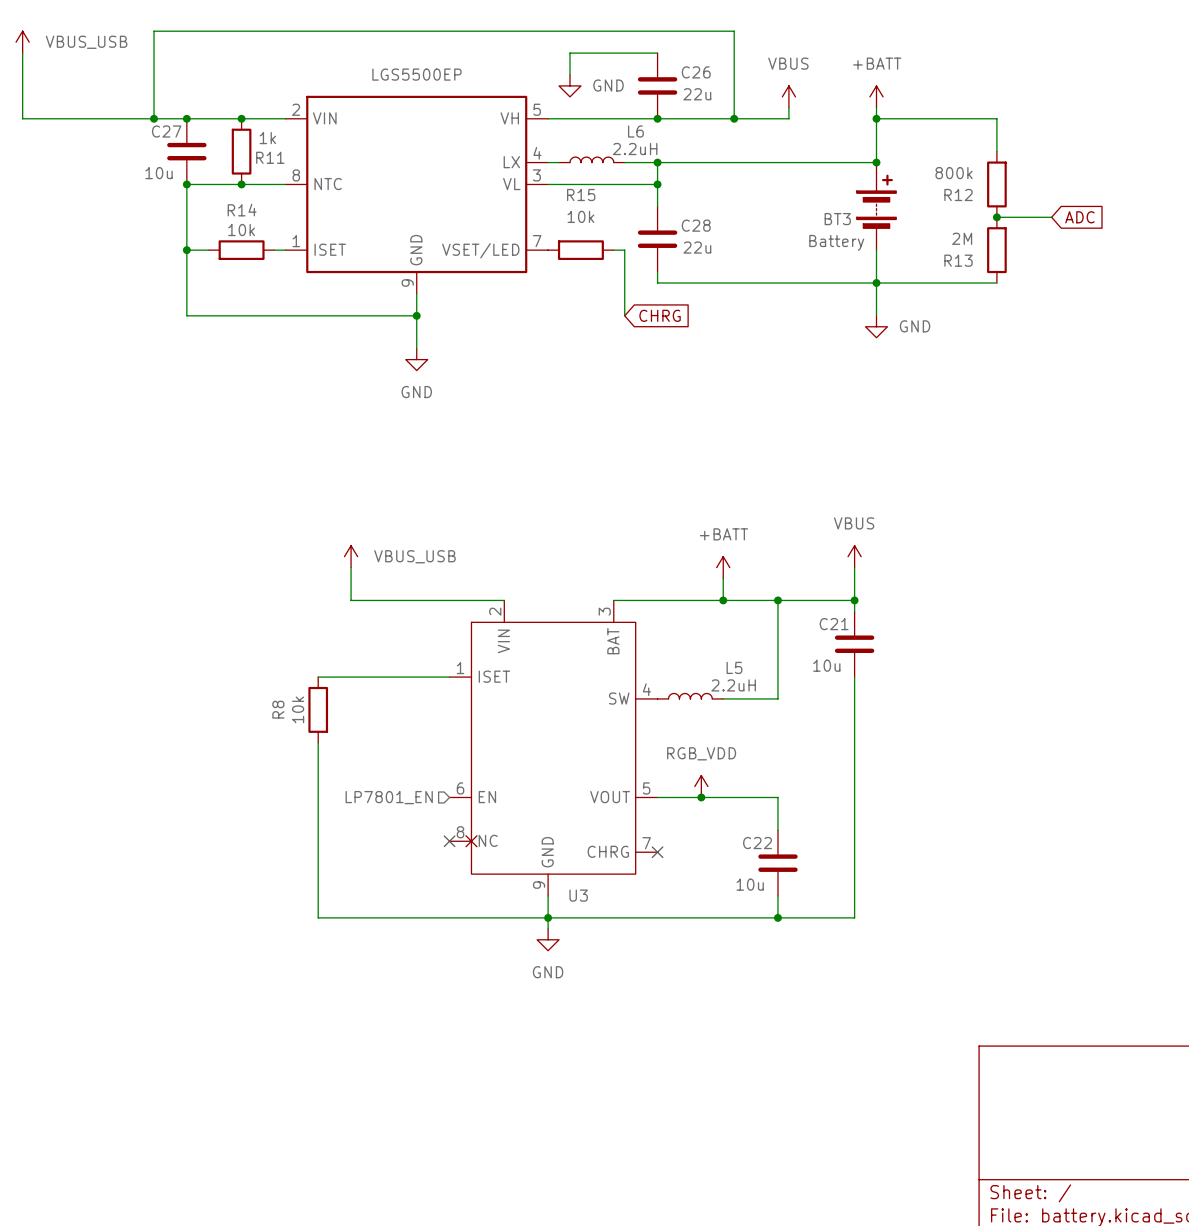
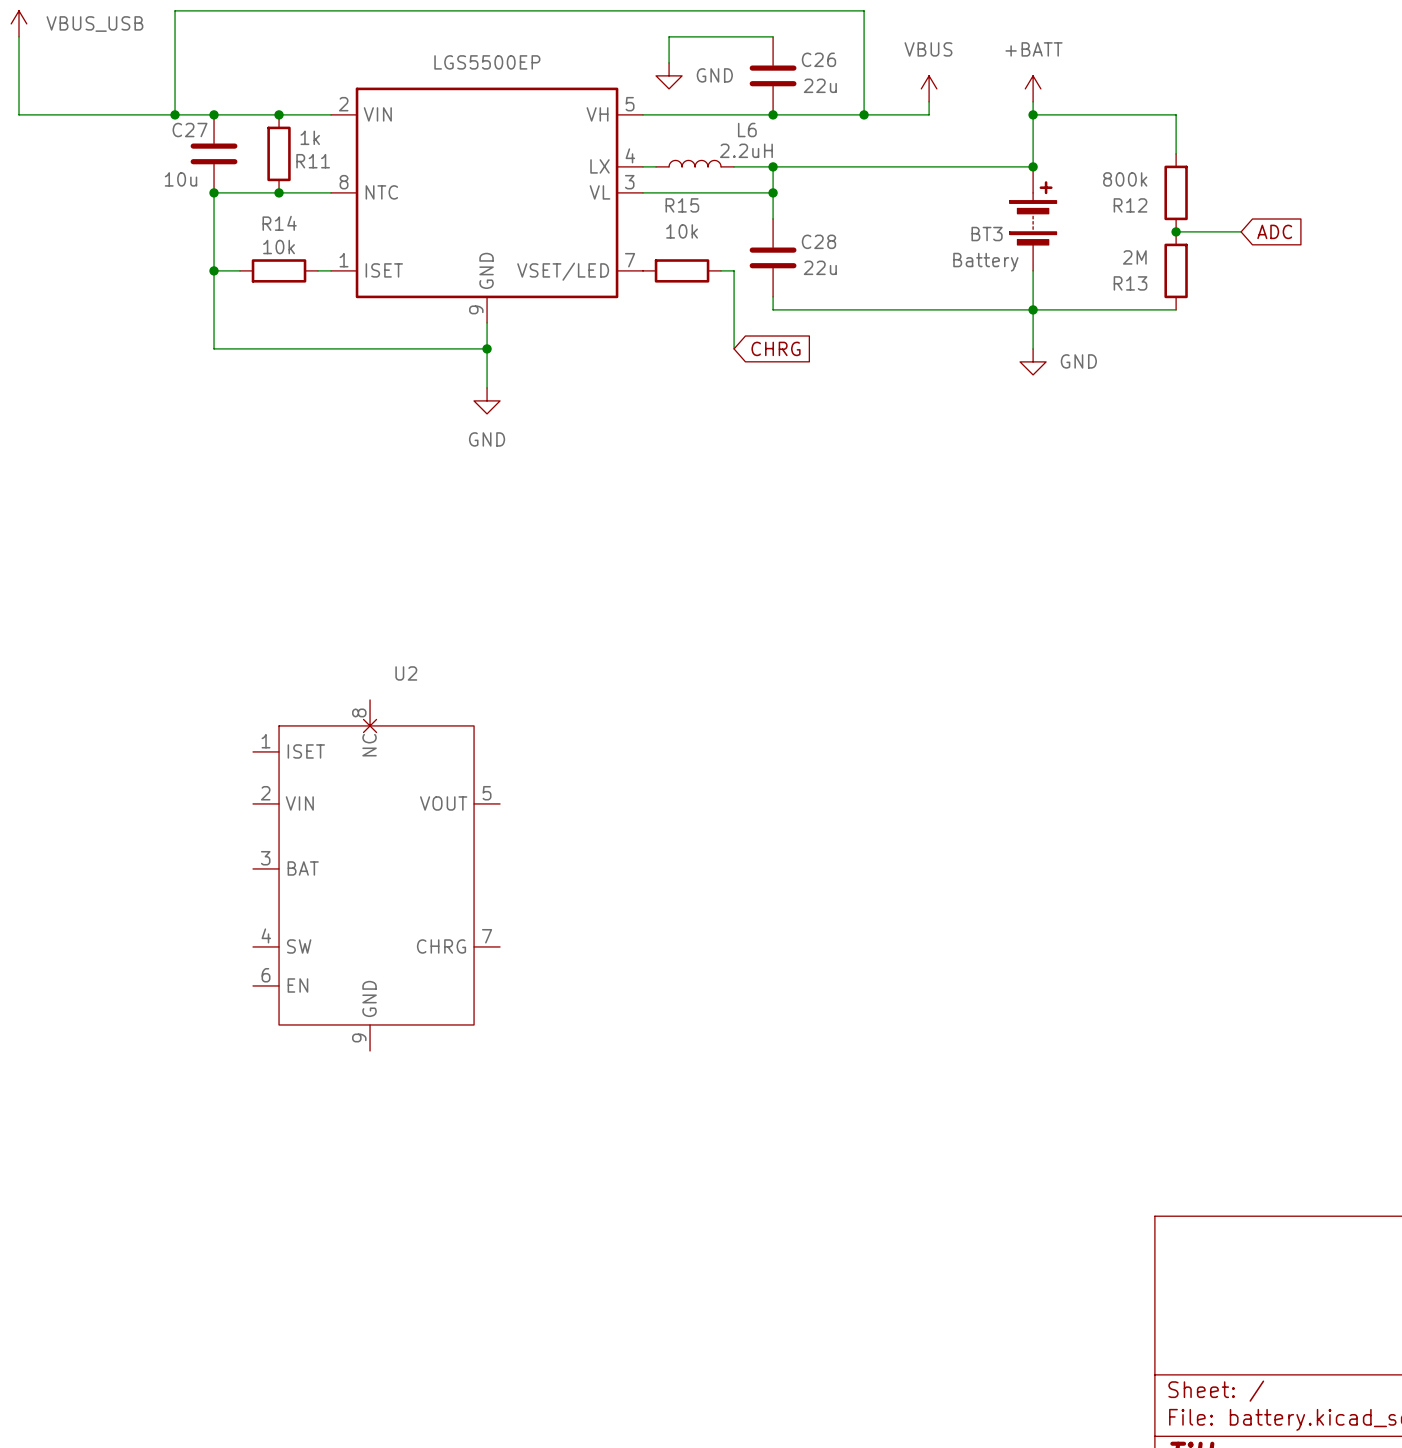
power symbol: VBUS_USB (351, 556) -> none
power symbol: VBUS (854, 556) -> none
wire: (351, 567) (351, 600) (504, 600) -> none
power symbol: +BATT (723, 567) -> none
wire: (854, 567) (854, 611) -> none
wire: (723, 578) (723, 600) -> none
wire: (613, 600) (854, 600) -> none
junction: (723, 600) -> none
wire: (777, 600) (777, 698) (723, 698) -> none
junction: (777, 600) -> none
junction: (854, 600) -> none
C21: 10u (854, 644) -> none
wire: (318, 677) (449, 677) -> none
wire: (854, 677) (854, 917) (318, 917) (318, 742) -> none
L5: 2.2uH (690, 696) -> none
R8: 10k (318, 709) -> none
U3: (553, 748) -> none
U2: none -> (376, 875)
power symbol: RGB_VDD (701, 786) -> none
hierarchical label: LP7801_EN (389, 797) -> none
wire: (657, 797) (777, 797) (777, 830) -> none
junction: (701, 797) -> none
no-connect mark: (449, 841) -> none
no-connect mark: (657, 852) -> none
C22: 10u (777, 863) -> none
wire: (548, 896) (548, 928) -> none
wire: (777, 896) (777, 917) -> none
junction: (548, 917) -> none
junction: (777, 917) -> none
power symbol: GND (548, 939) -> none

